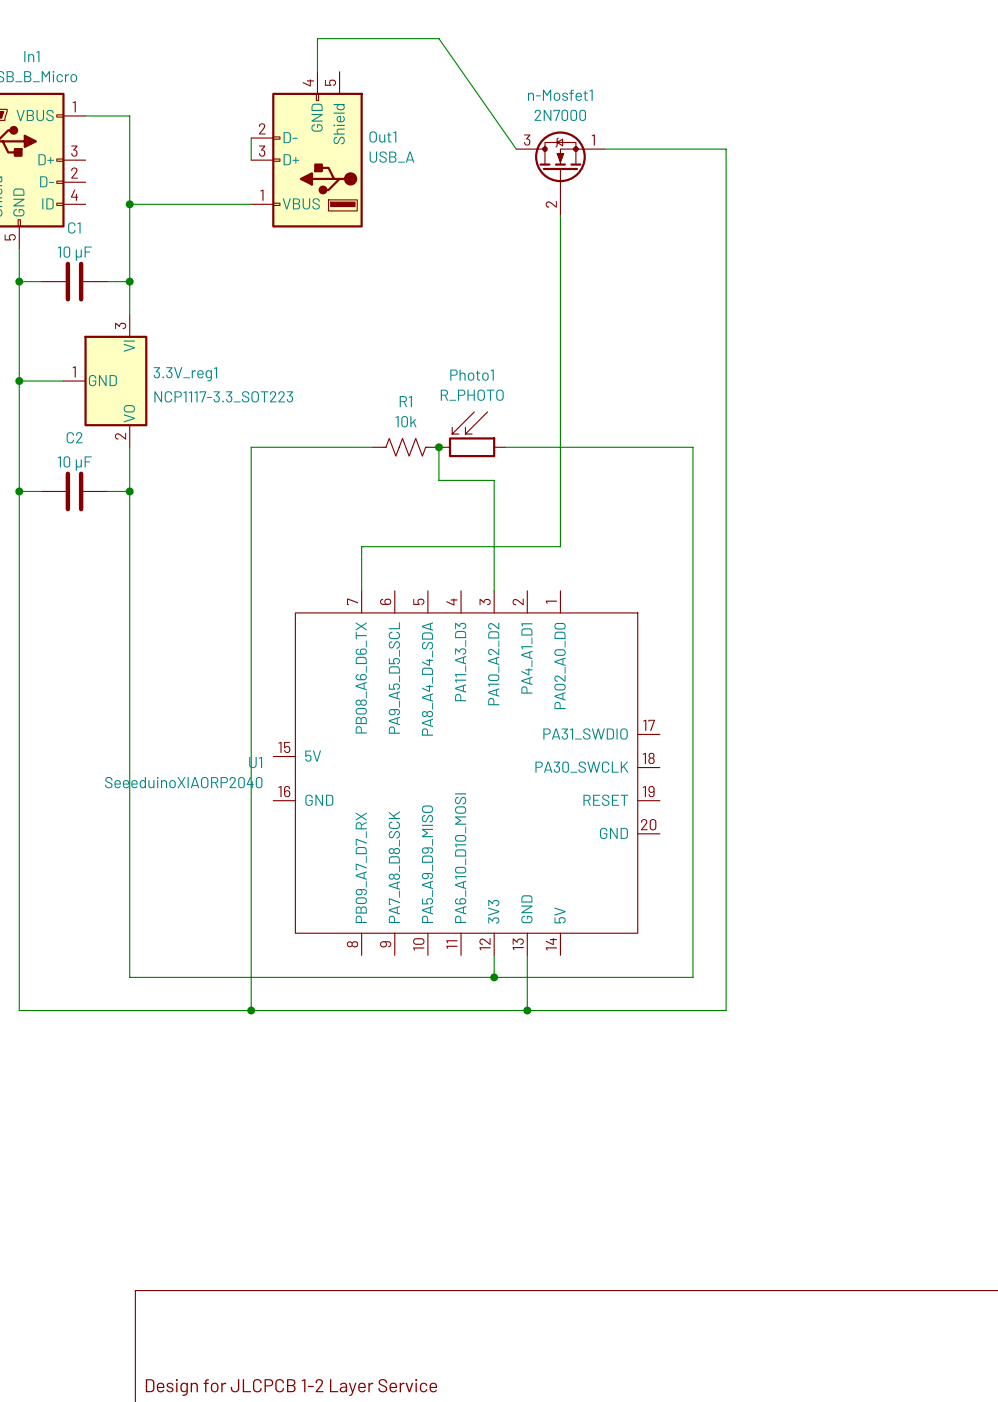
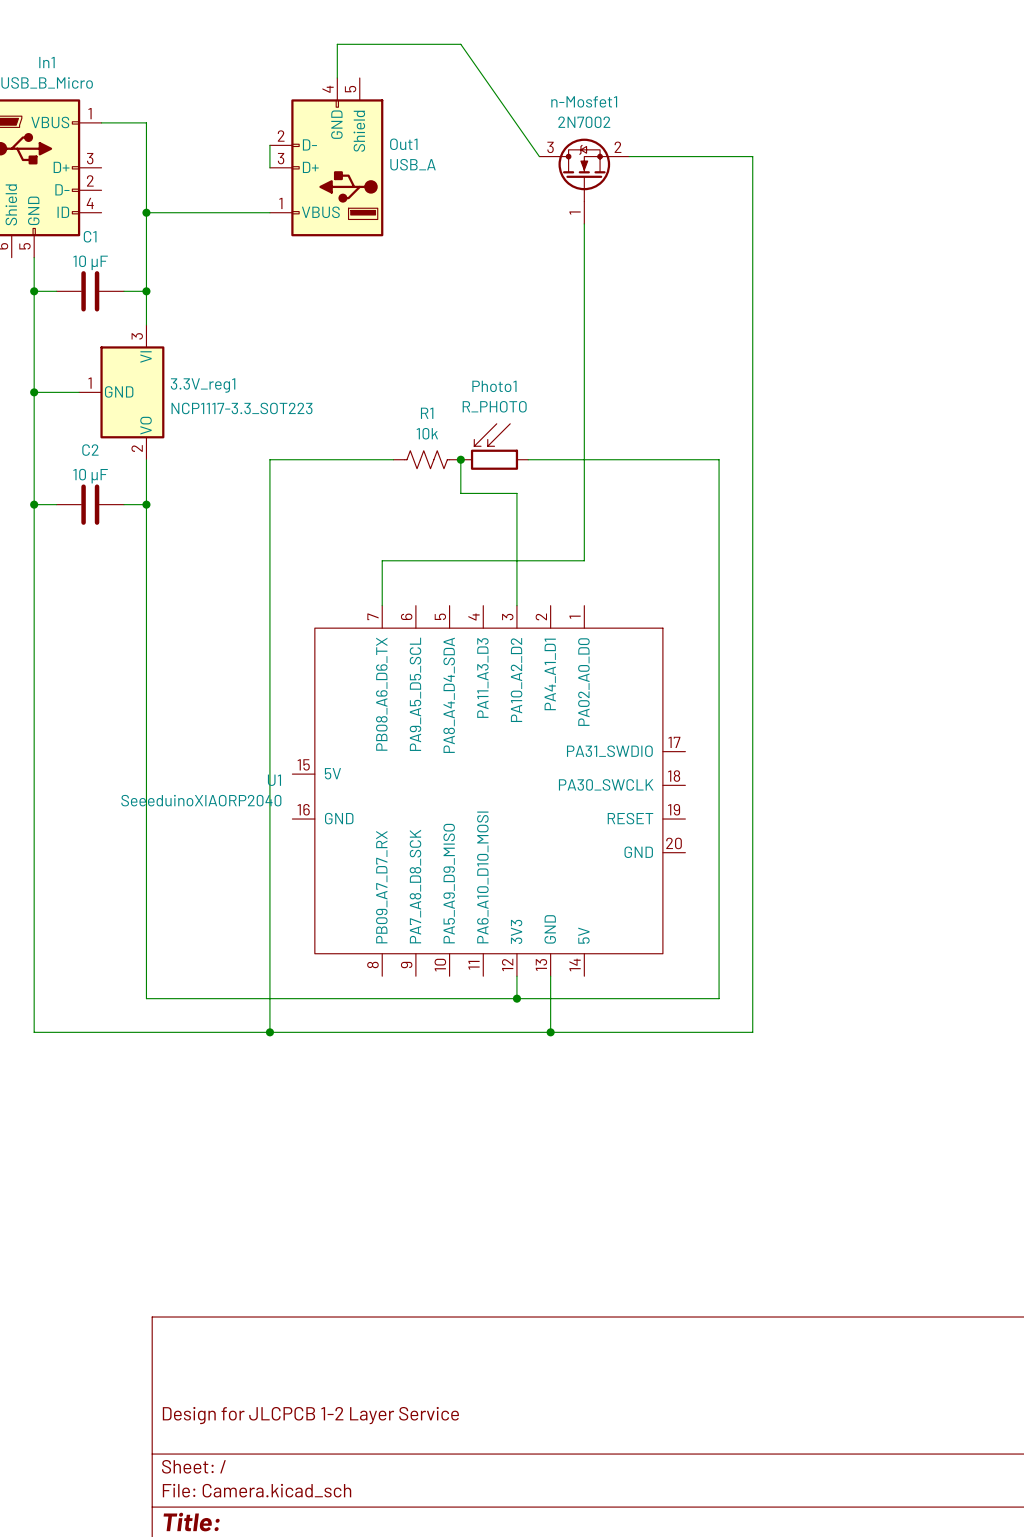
n-Mosfet1 value: 2N7000 (560, 115) -> 2N7002 (584, 122)
n-Mosfet1 pin number: 1 (593, 139) -> 2 (617, 147)
n-Mosfet1 pin number: 2 (551, 204) -> 1 (575, 213)

